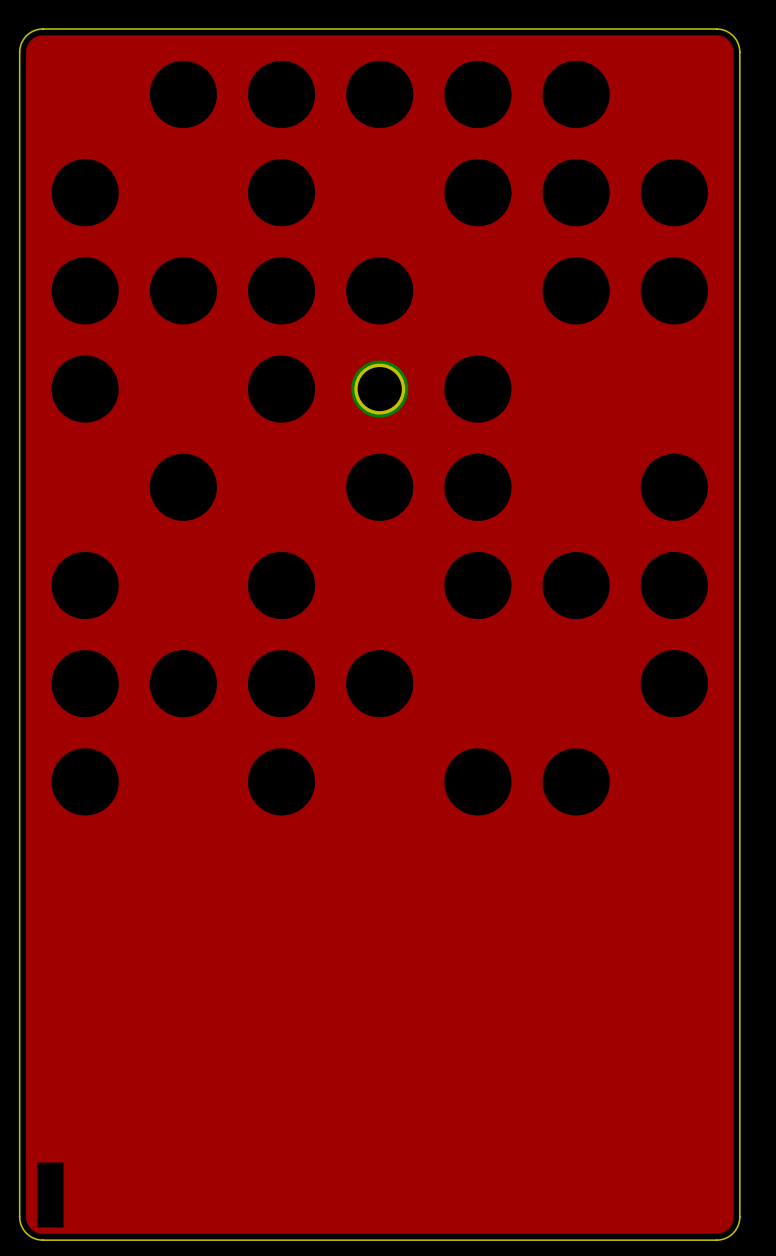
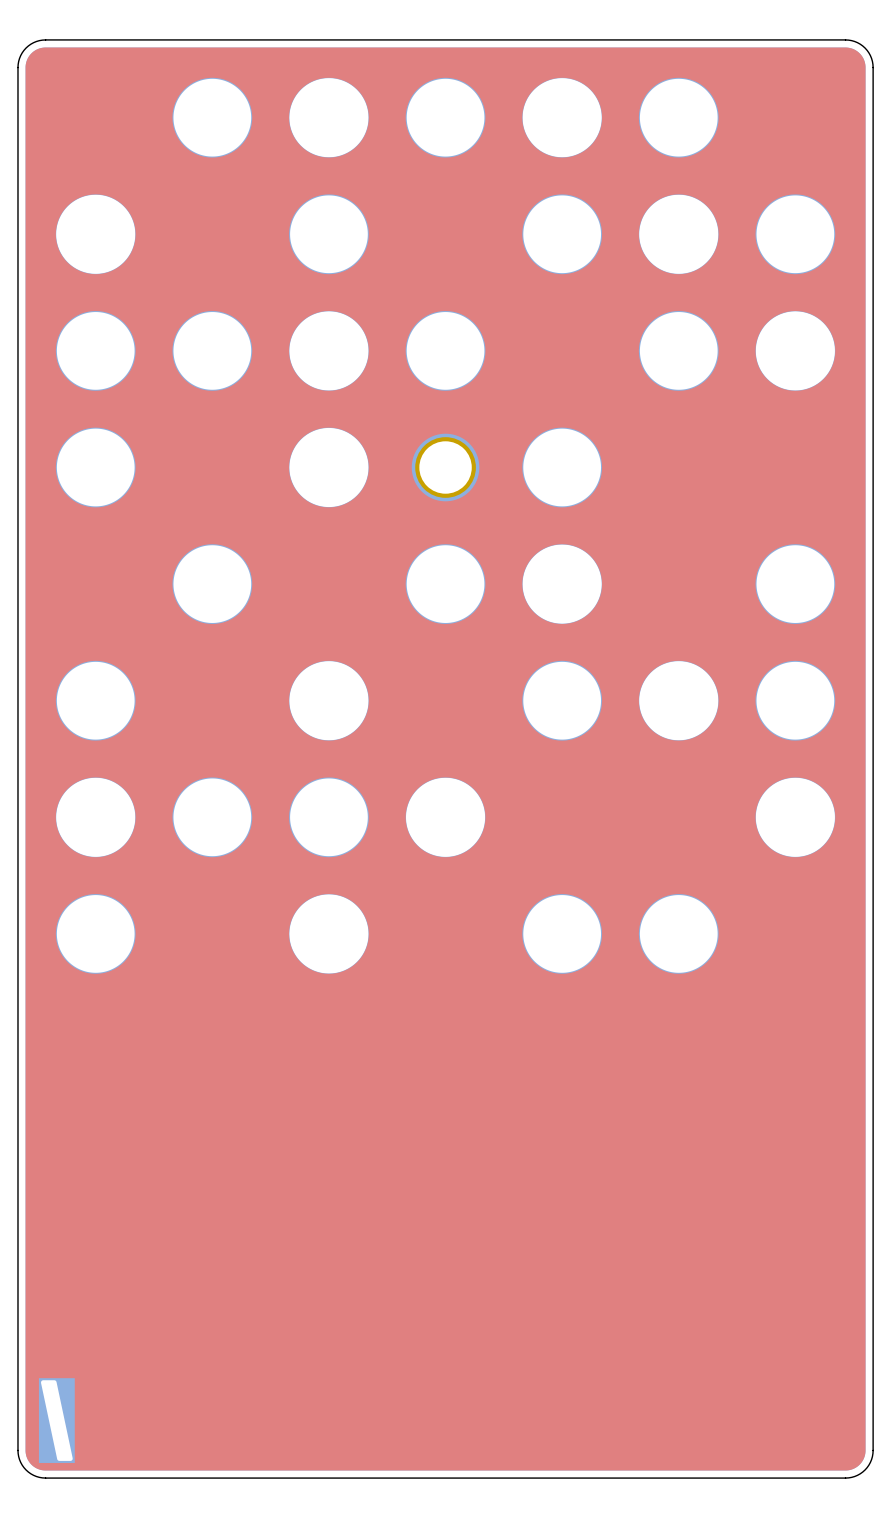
drawing: [26, 35, 734, 1234] -> none
drawing: none -> [25, 47, 866, 1471]

